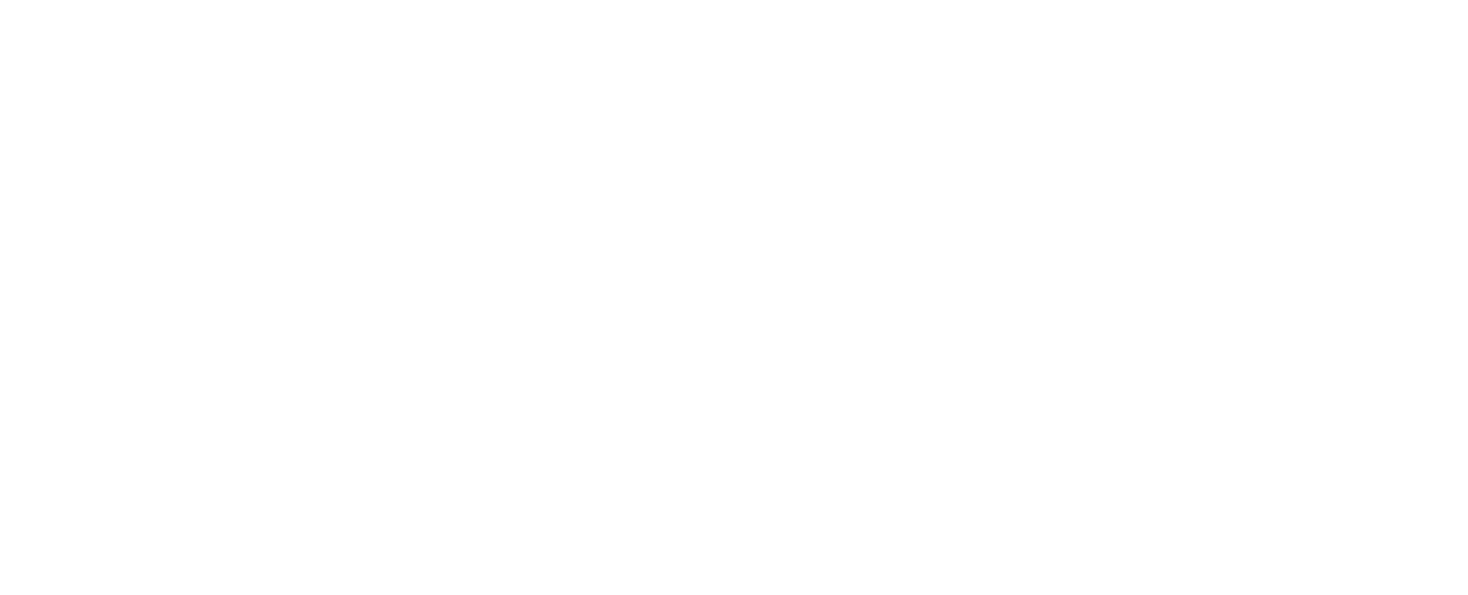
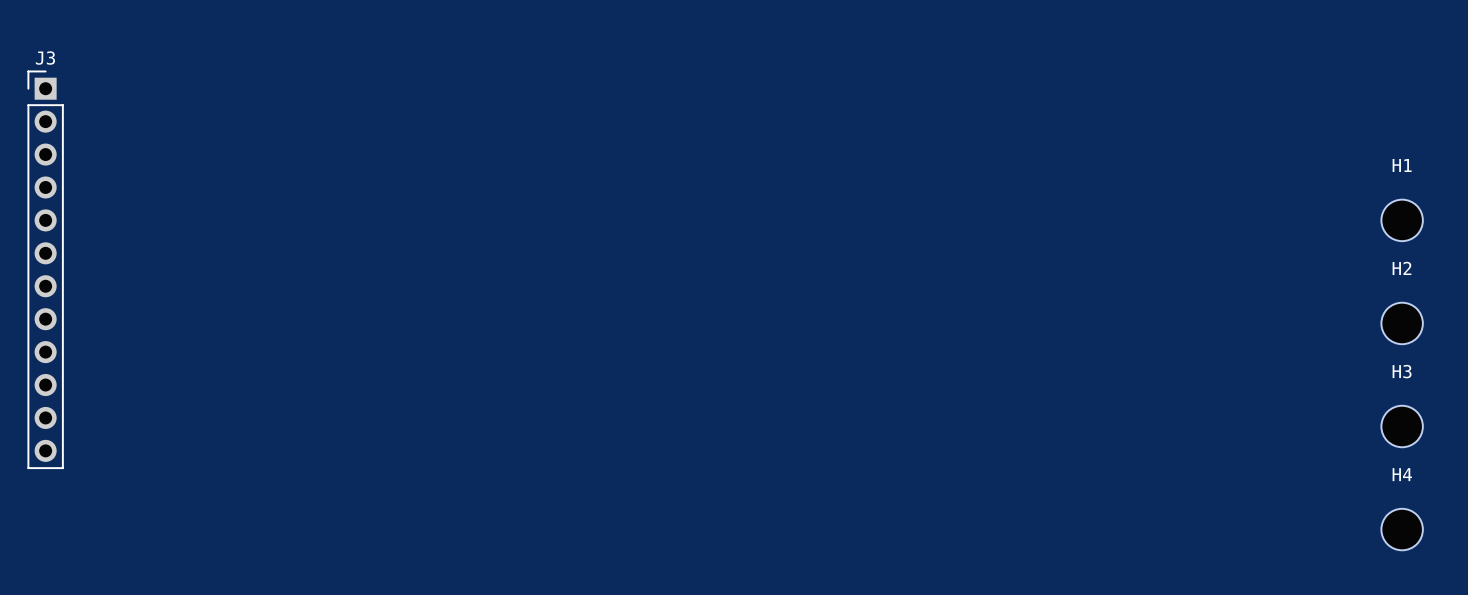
H1: none -> (1402, 220)
J3: none -> (45, 269)
H2: none -> (1402, 323)
H3: none -> (1402, 426)
H4: none -> (1402, 529)

